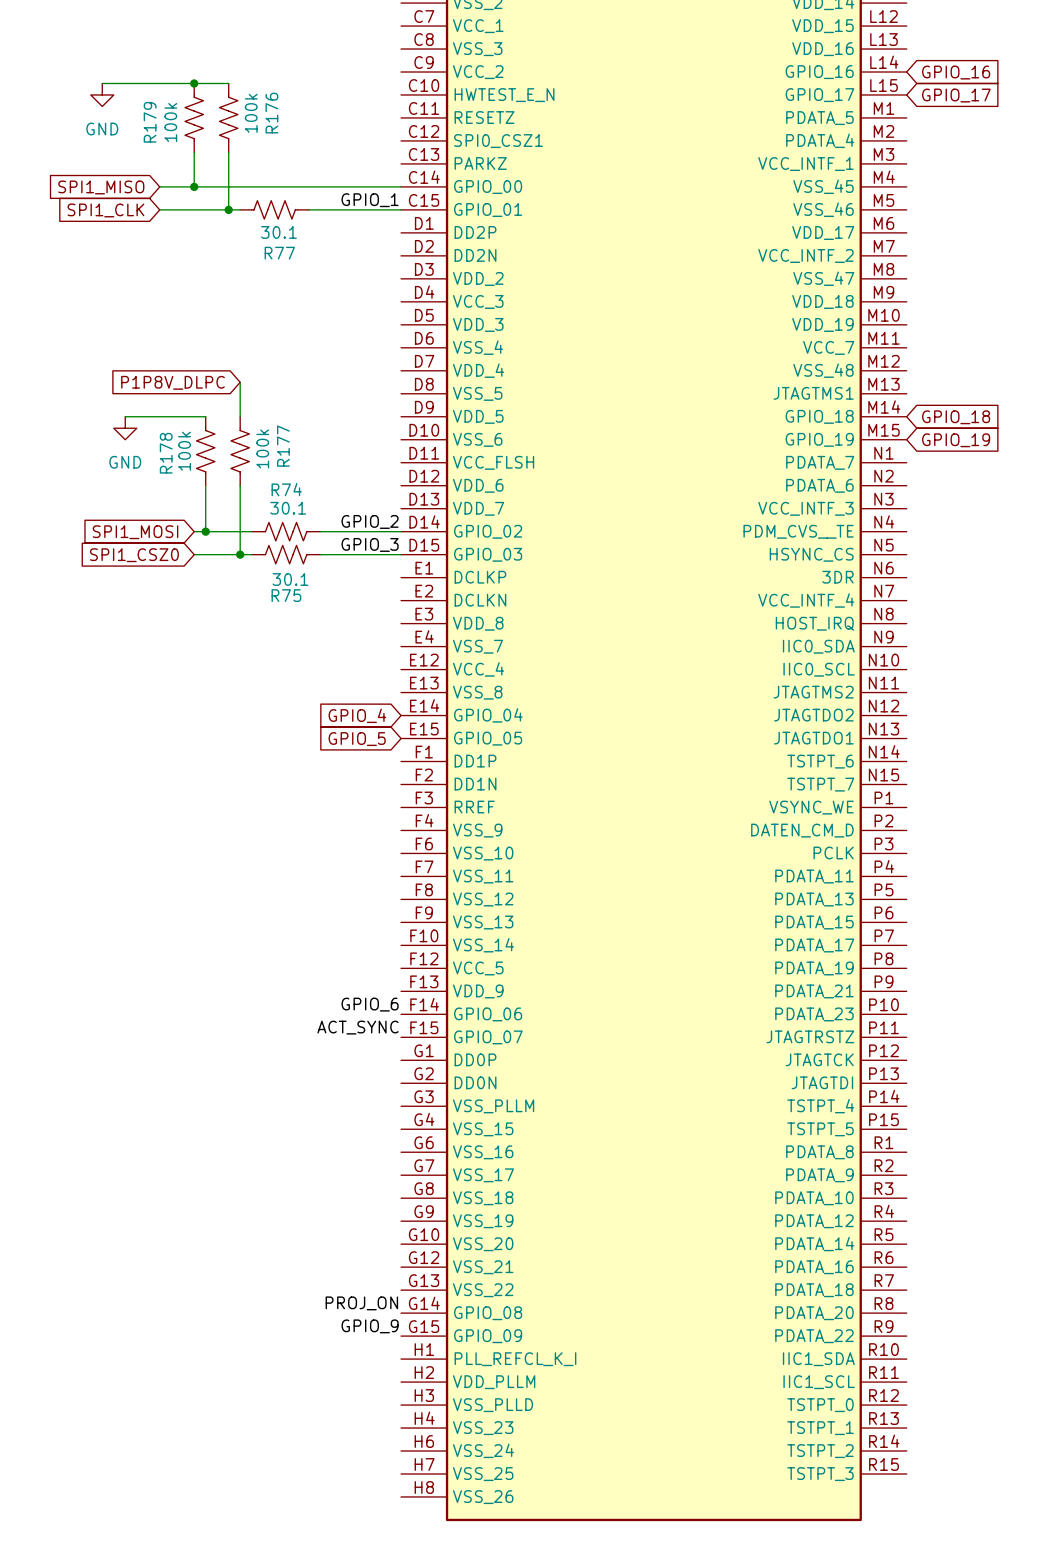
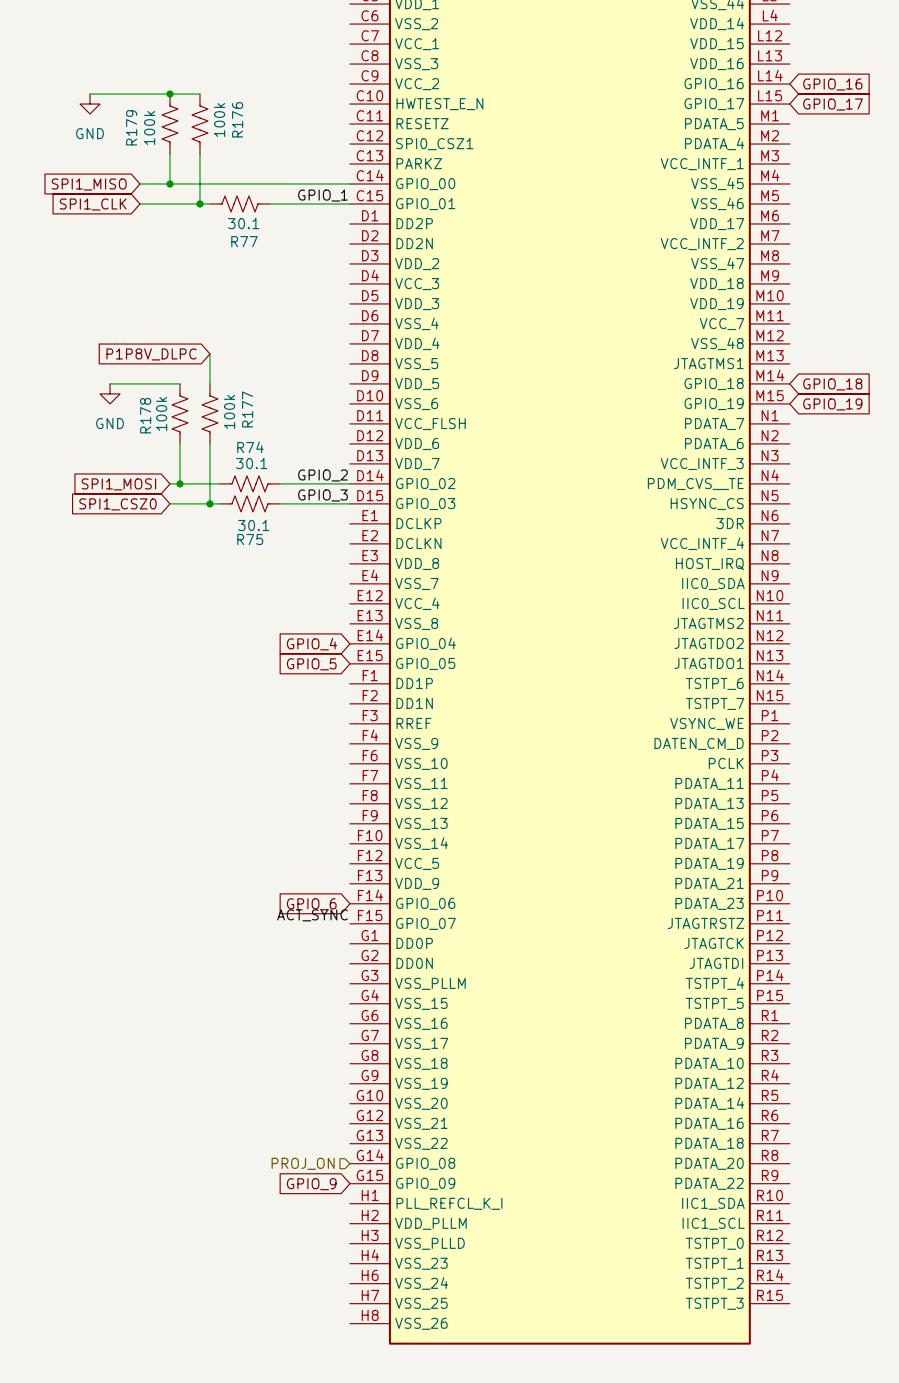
label: GPIO_6 (370, 1004) -> none
global label: none -> GPIO_6 (311, 904)
label: PROJ_ON (361, 1303) -> none
hierarchical label: none -> PROJ_ON (303, 1163)
label: GPIO_9 (370, 1326) -> none
global label: none -> GPIO_9 (311, 1184)

